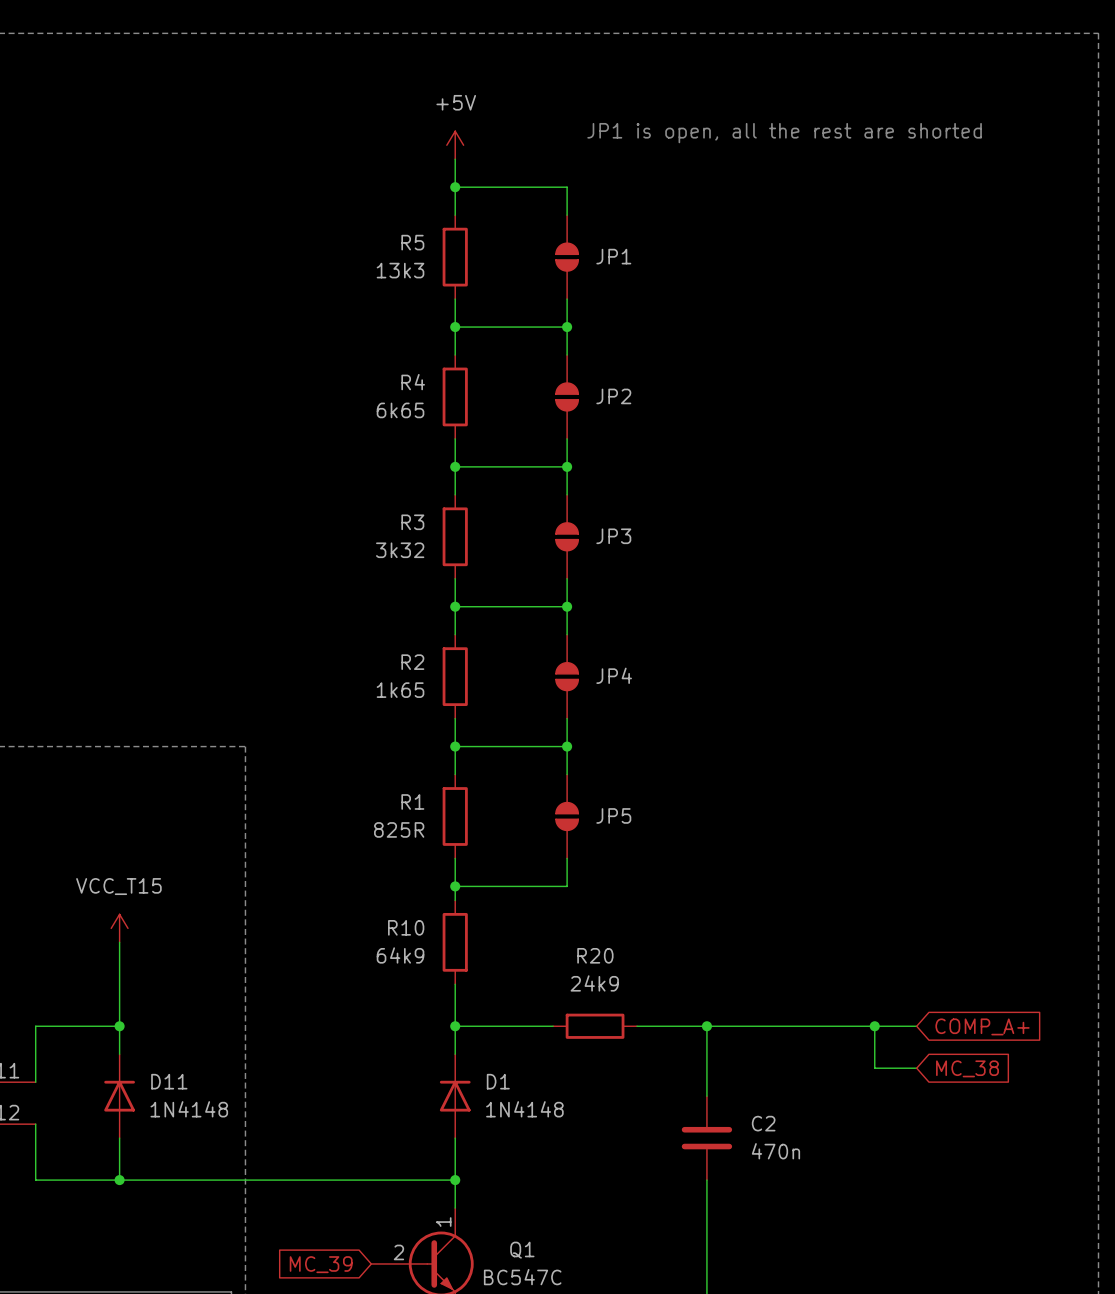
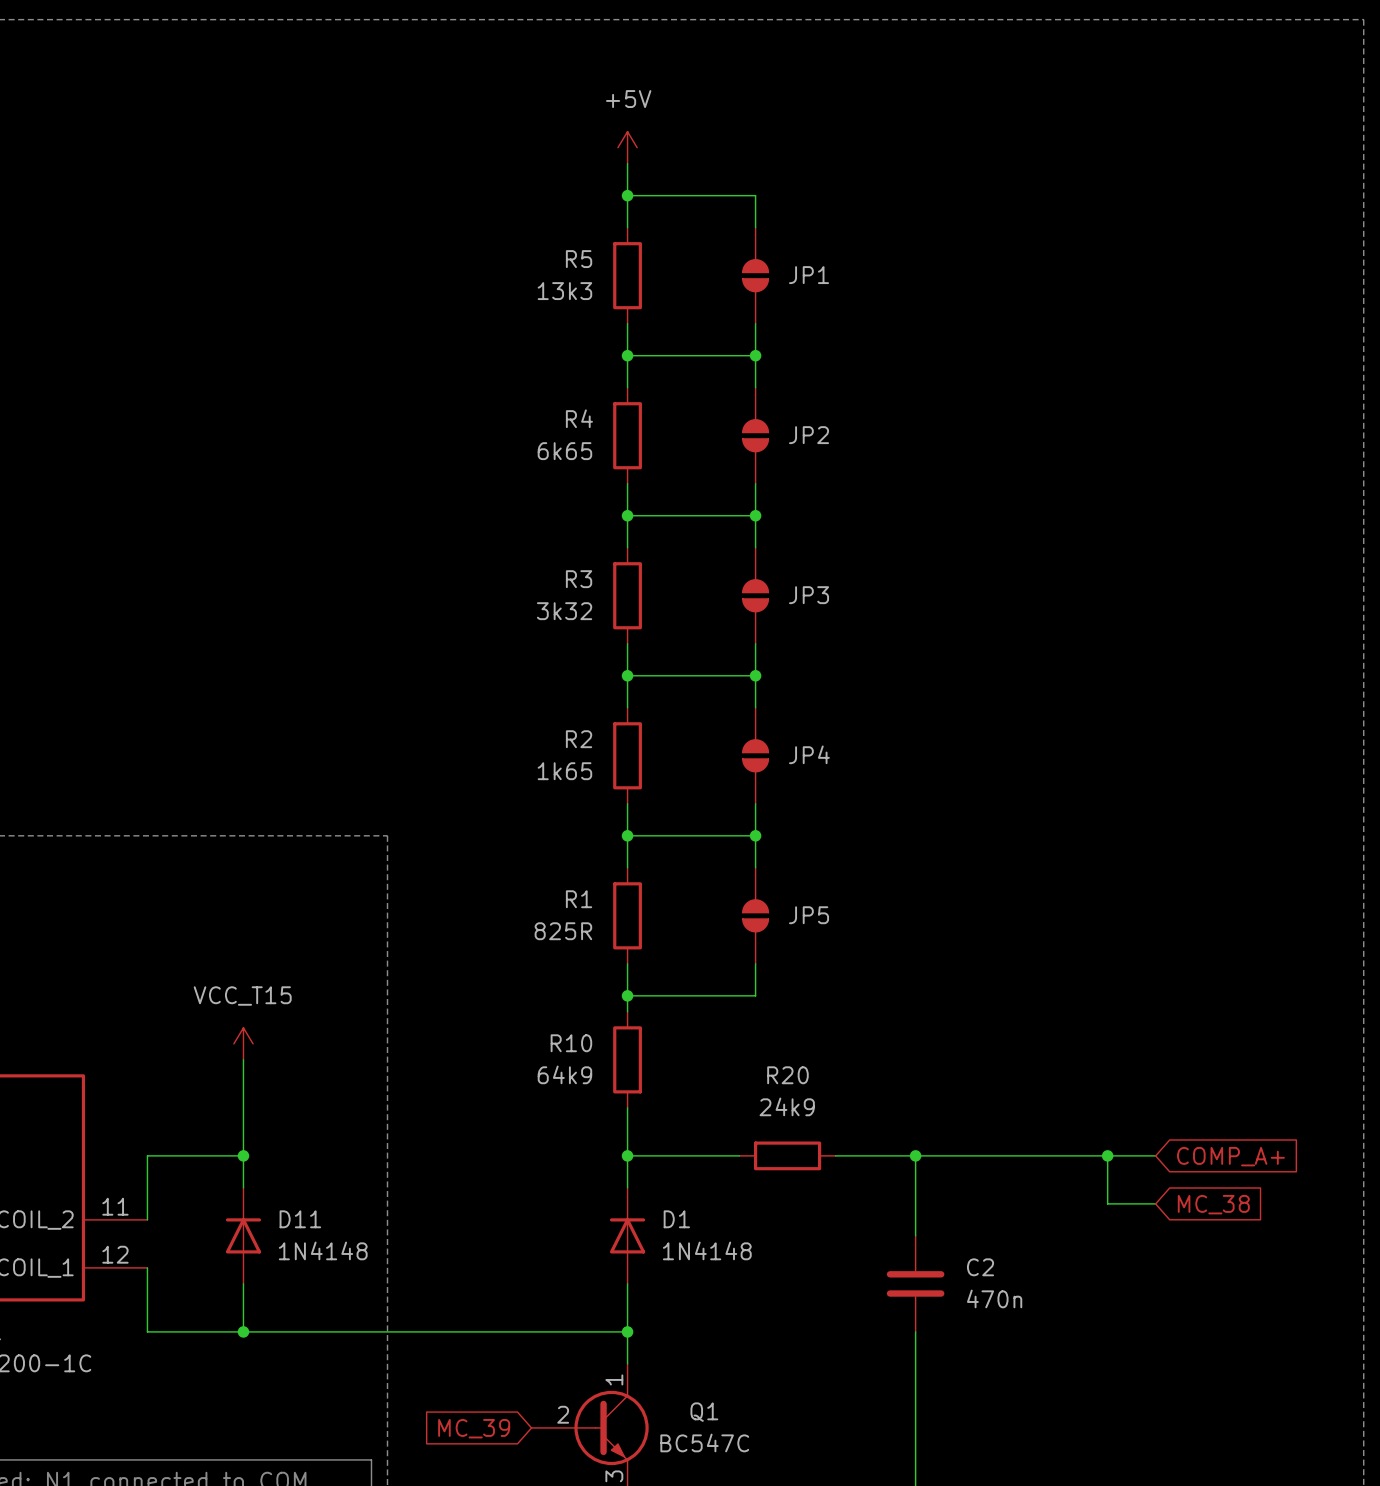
text: JP1 is open, all the rest are shorted (784, 133) -> none

